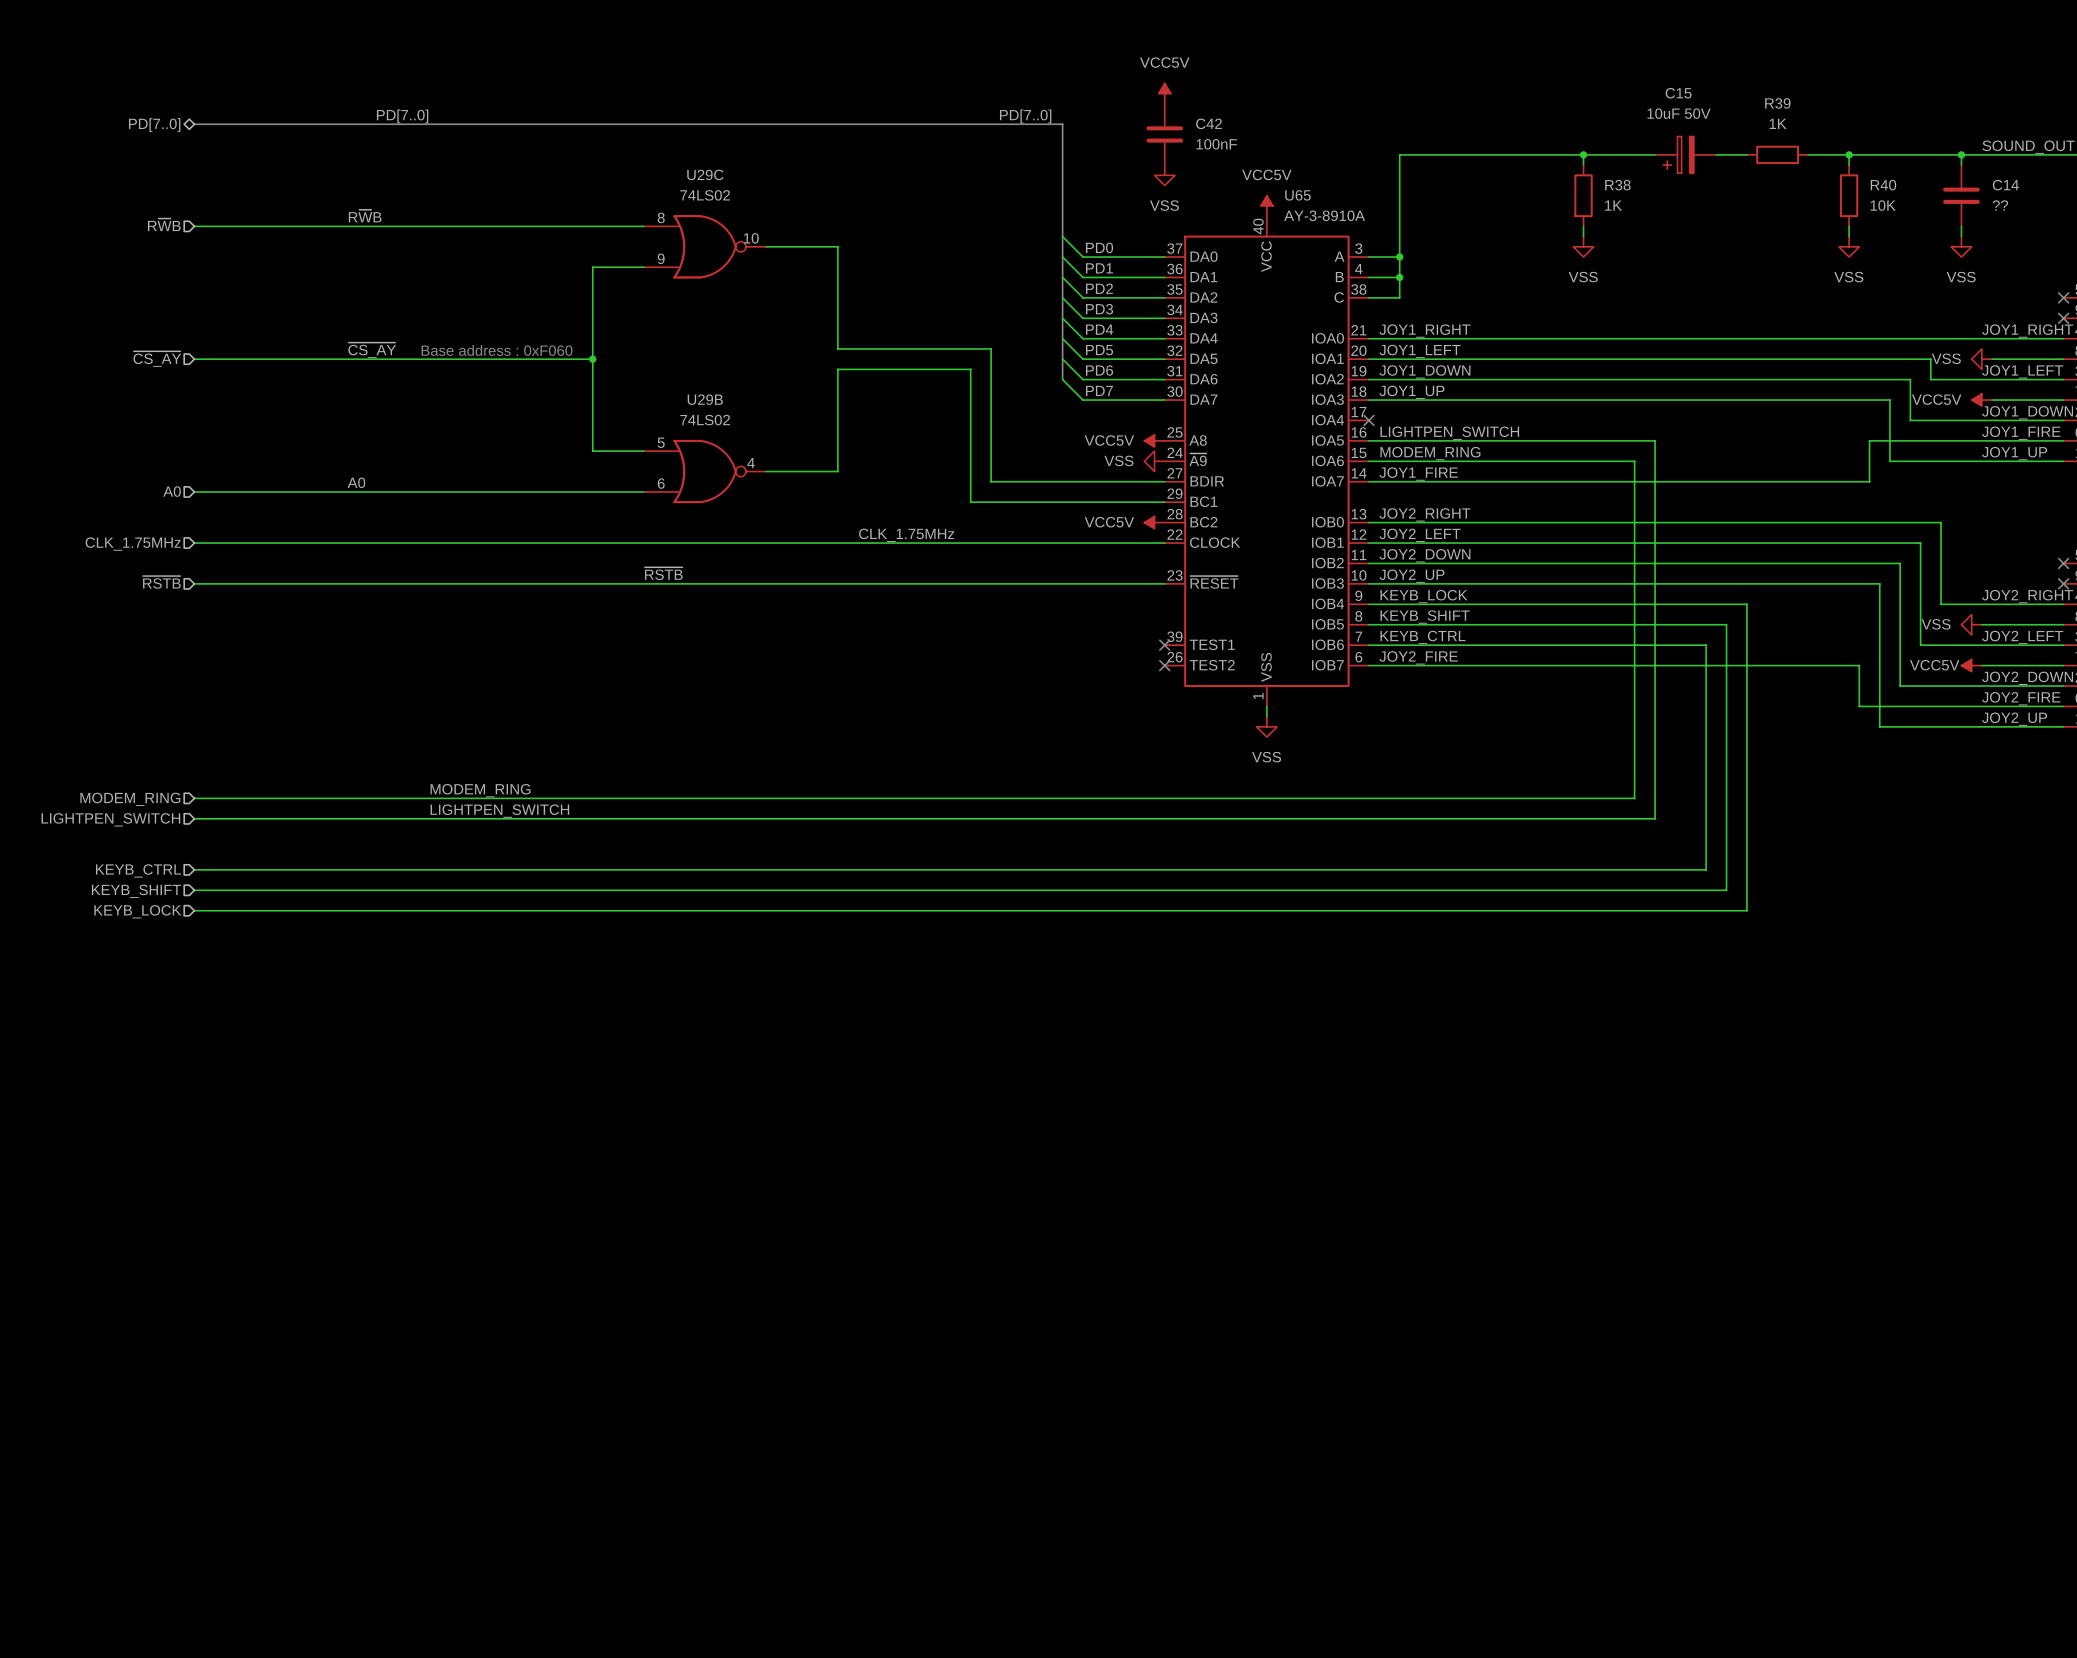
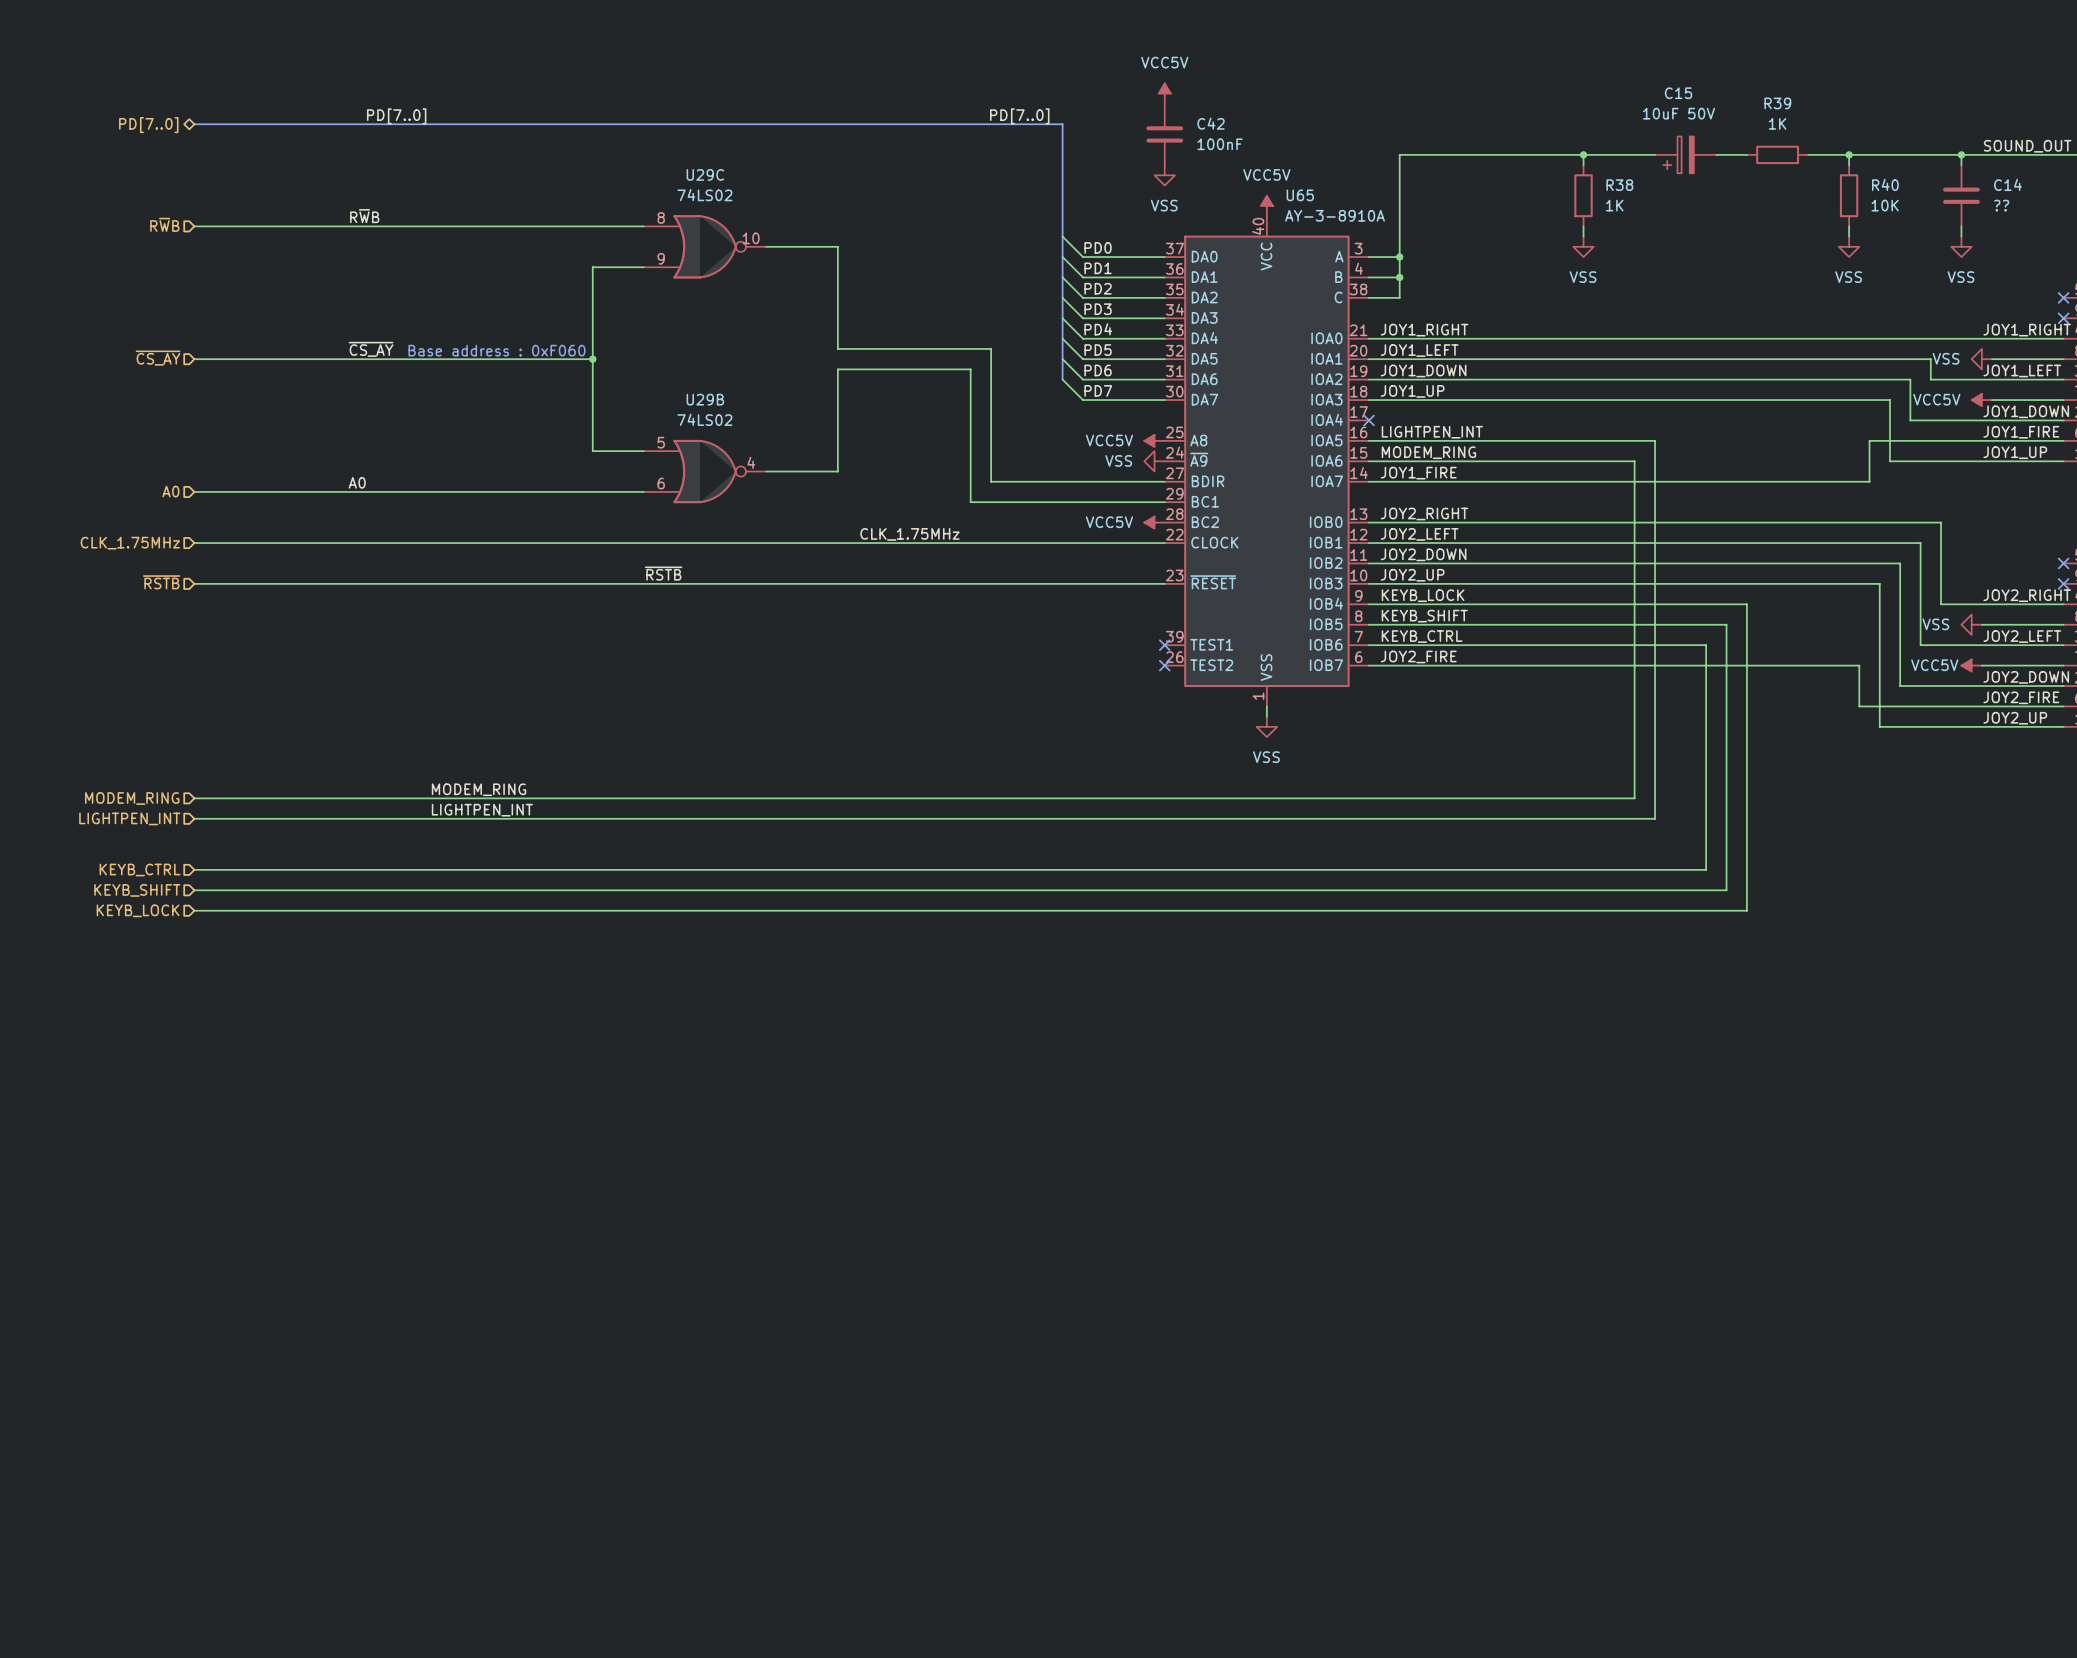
label: LIGHTPEN_SWITCH (1449, 433) -> LIGHTPEN_INT (1432, 432)
label: LIGHTPEN_SWITCH (499, 811) -> LIGHTPEN_INT (482, 810)
hierarchical label: LIGHTPEN_SWITCH (110, 819) -> LIGHTPEN_INT (129, 818)

